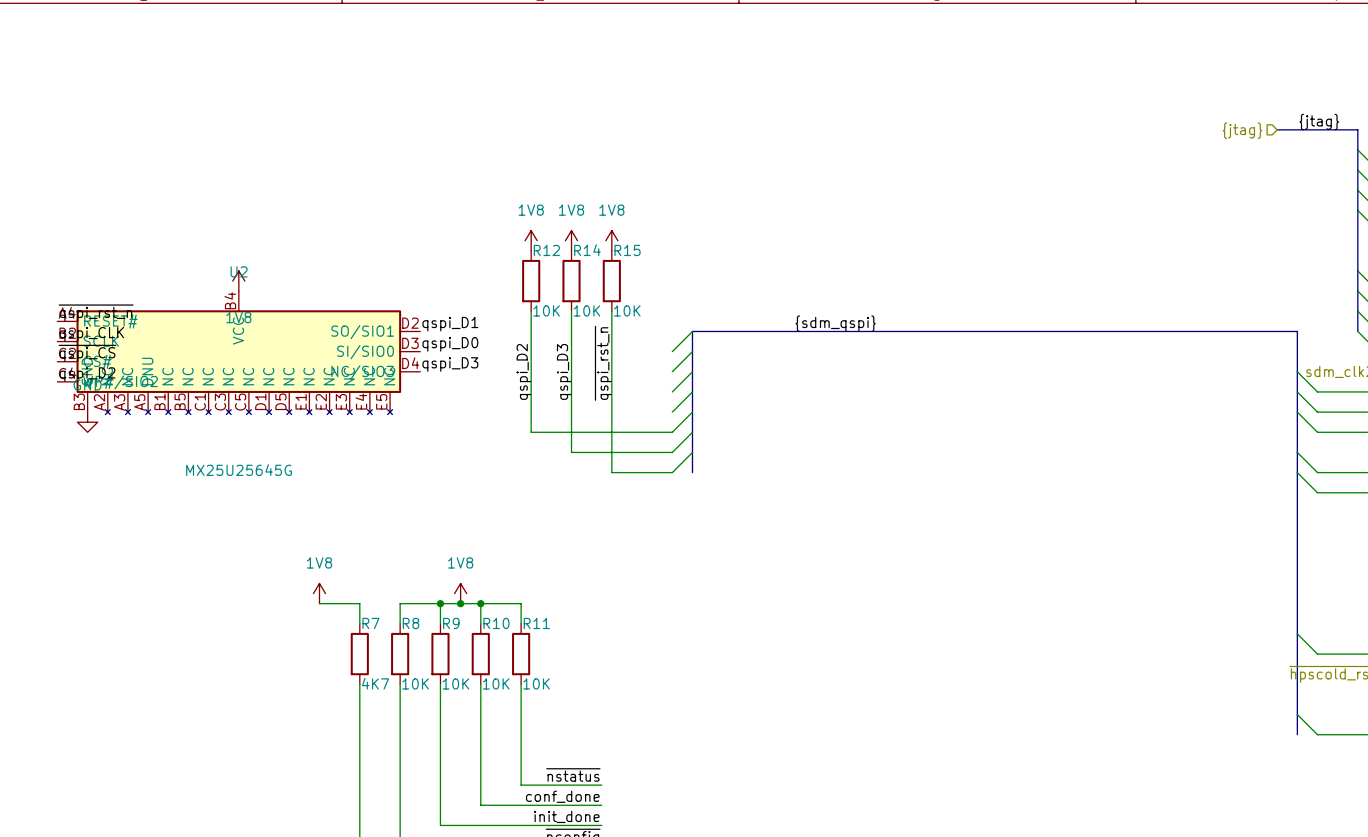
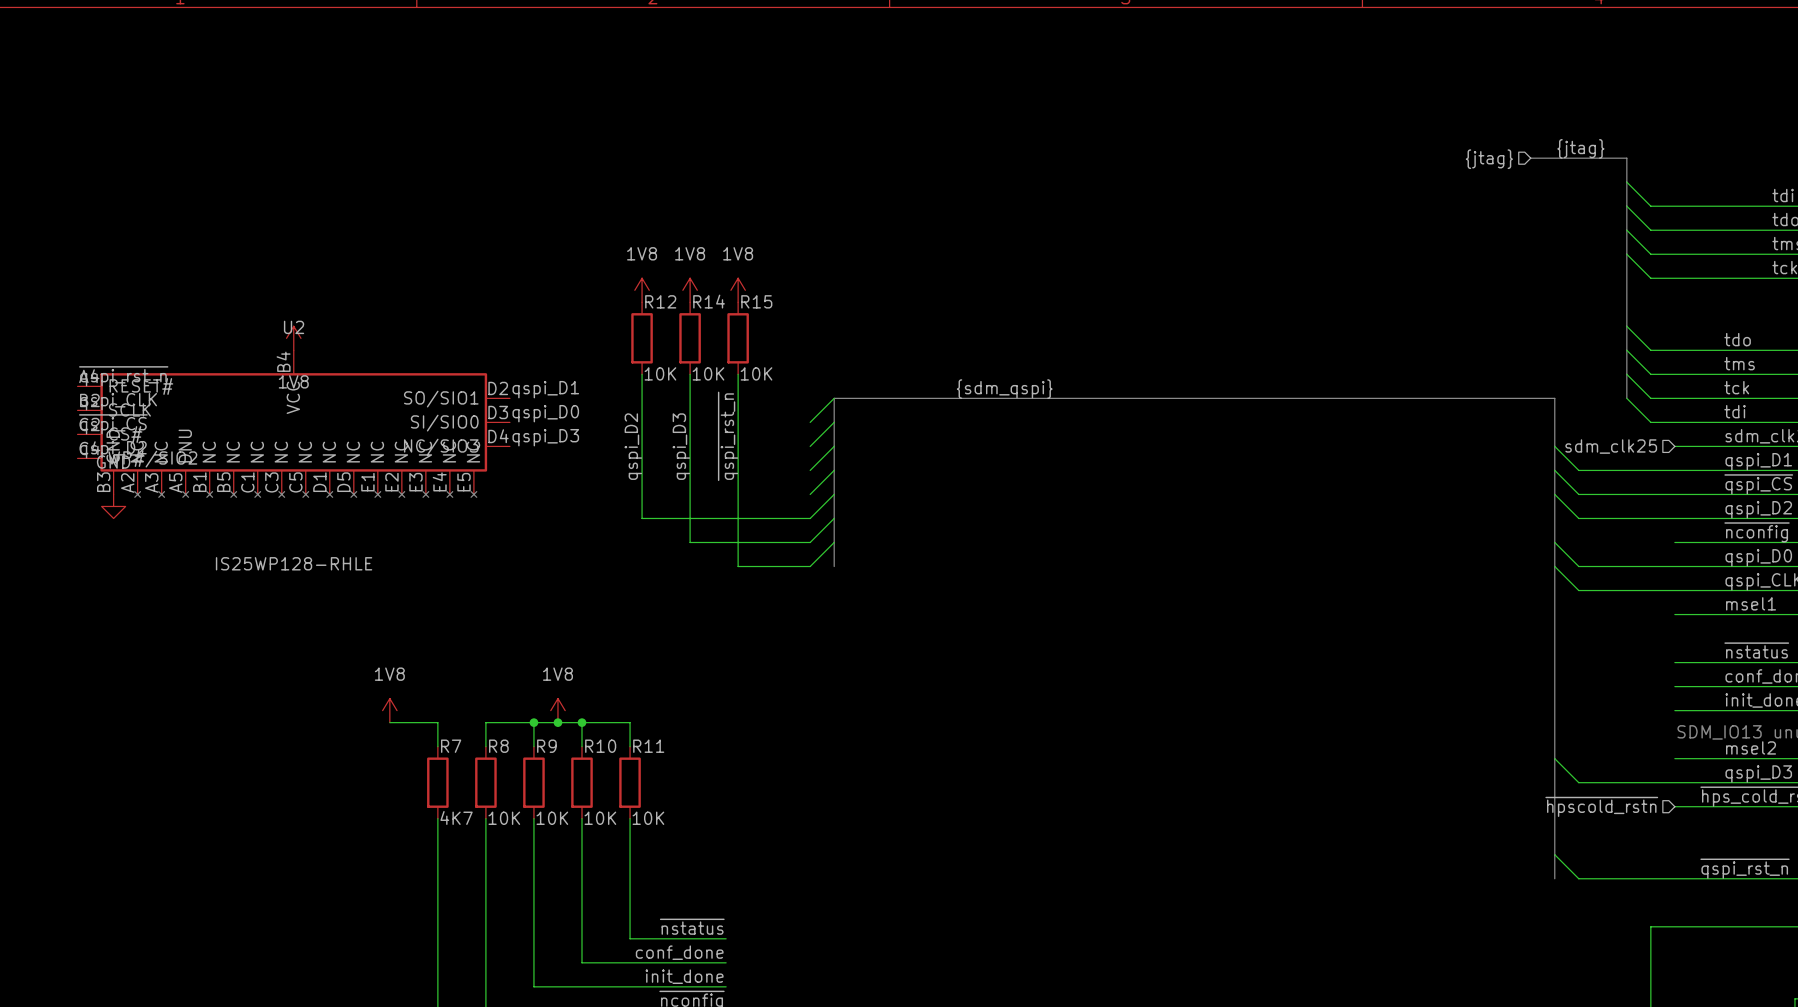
U2 value: MX25U25645G (239, 470) -> IS25WP128-RHLE (294, 563)

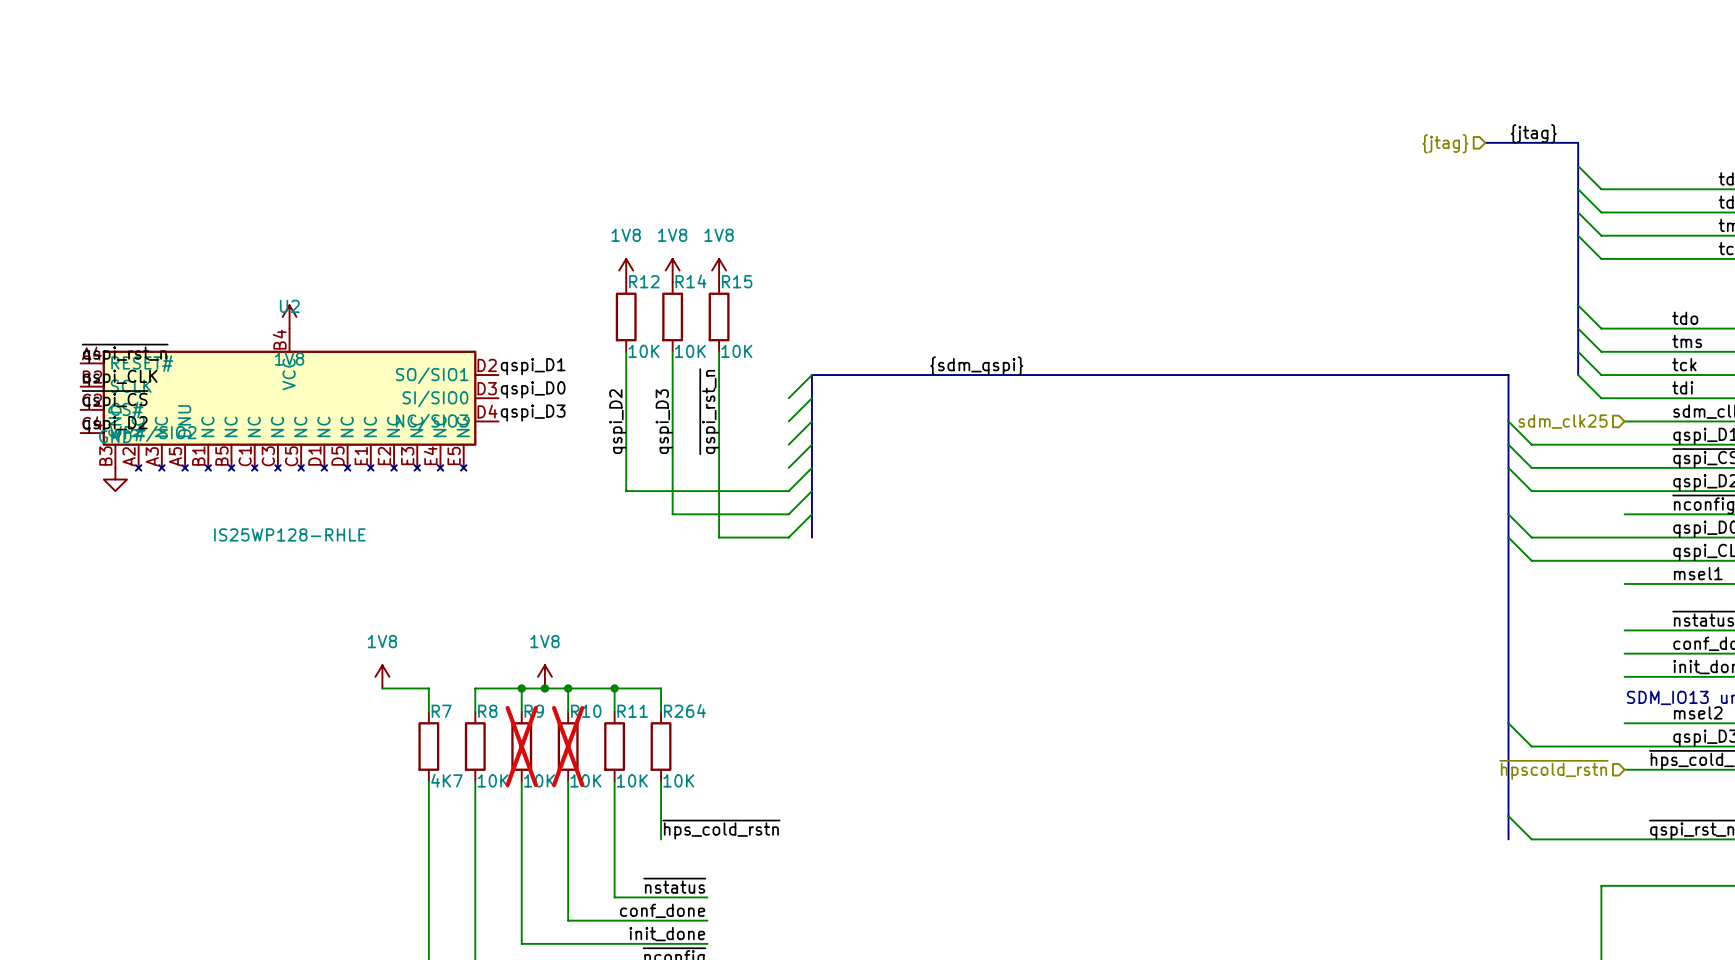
wire: none -> (614, 688) (661, 688) (661, 711)
junction: none -> (614, 688)
R9 do-not-place cross: none -> (521, 746)
R10 do-not-place cross: none -> (568, 746)
R264: none -> 10K (661, 746)
wire: none -> (661, 781) (661, 839)
label: none -> ~{hps_cold_rstn} (721, 829)

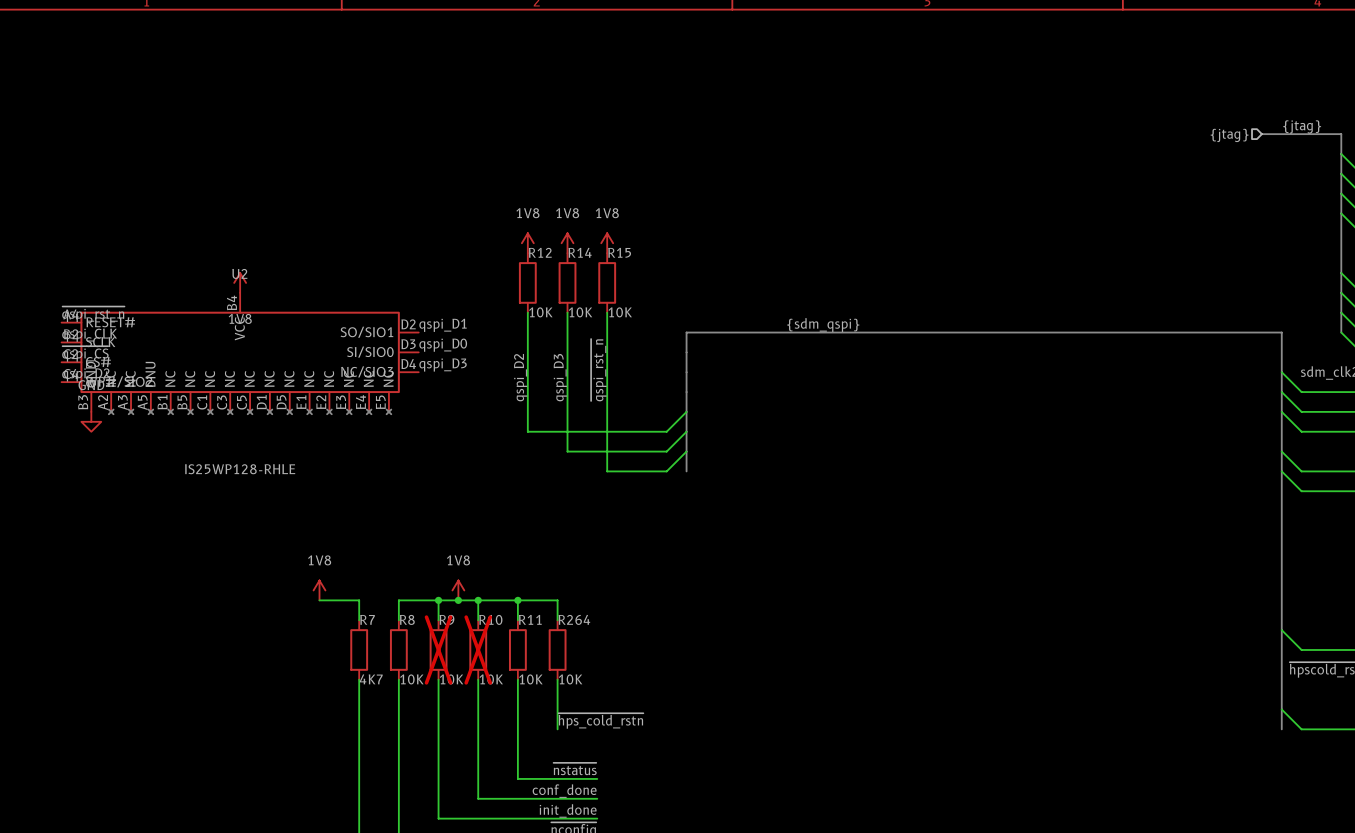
wire: (811, 375) (788, 398) -> none
wire: (811, 398) (788, 421) -> none
wire: (811, 421) (788, 444) -> none
wire: (811, 444) (788, 467) -> none

